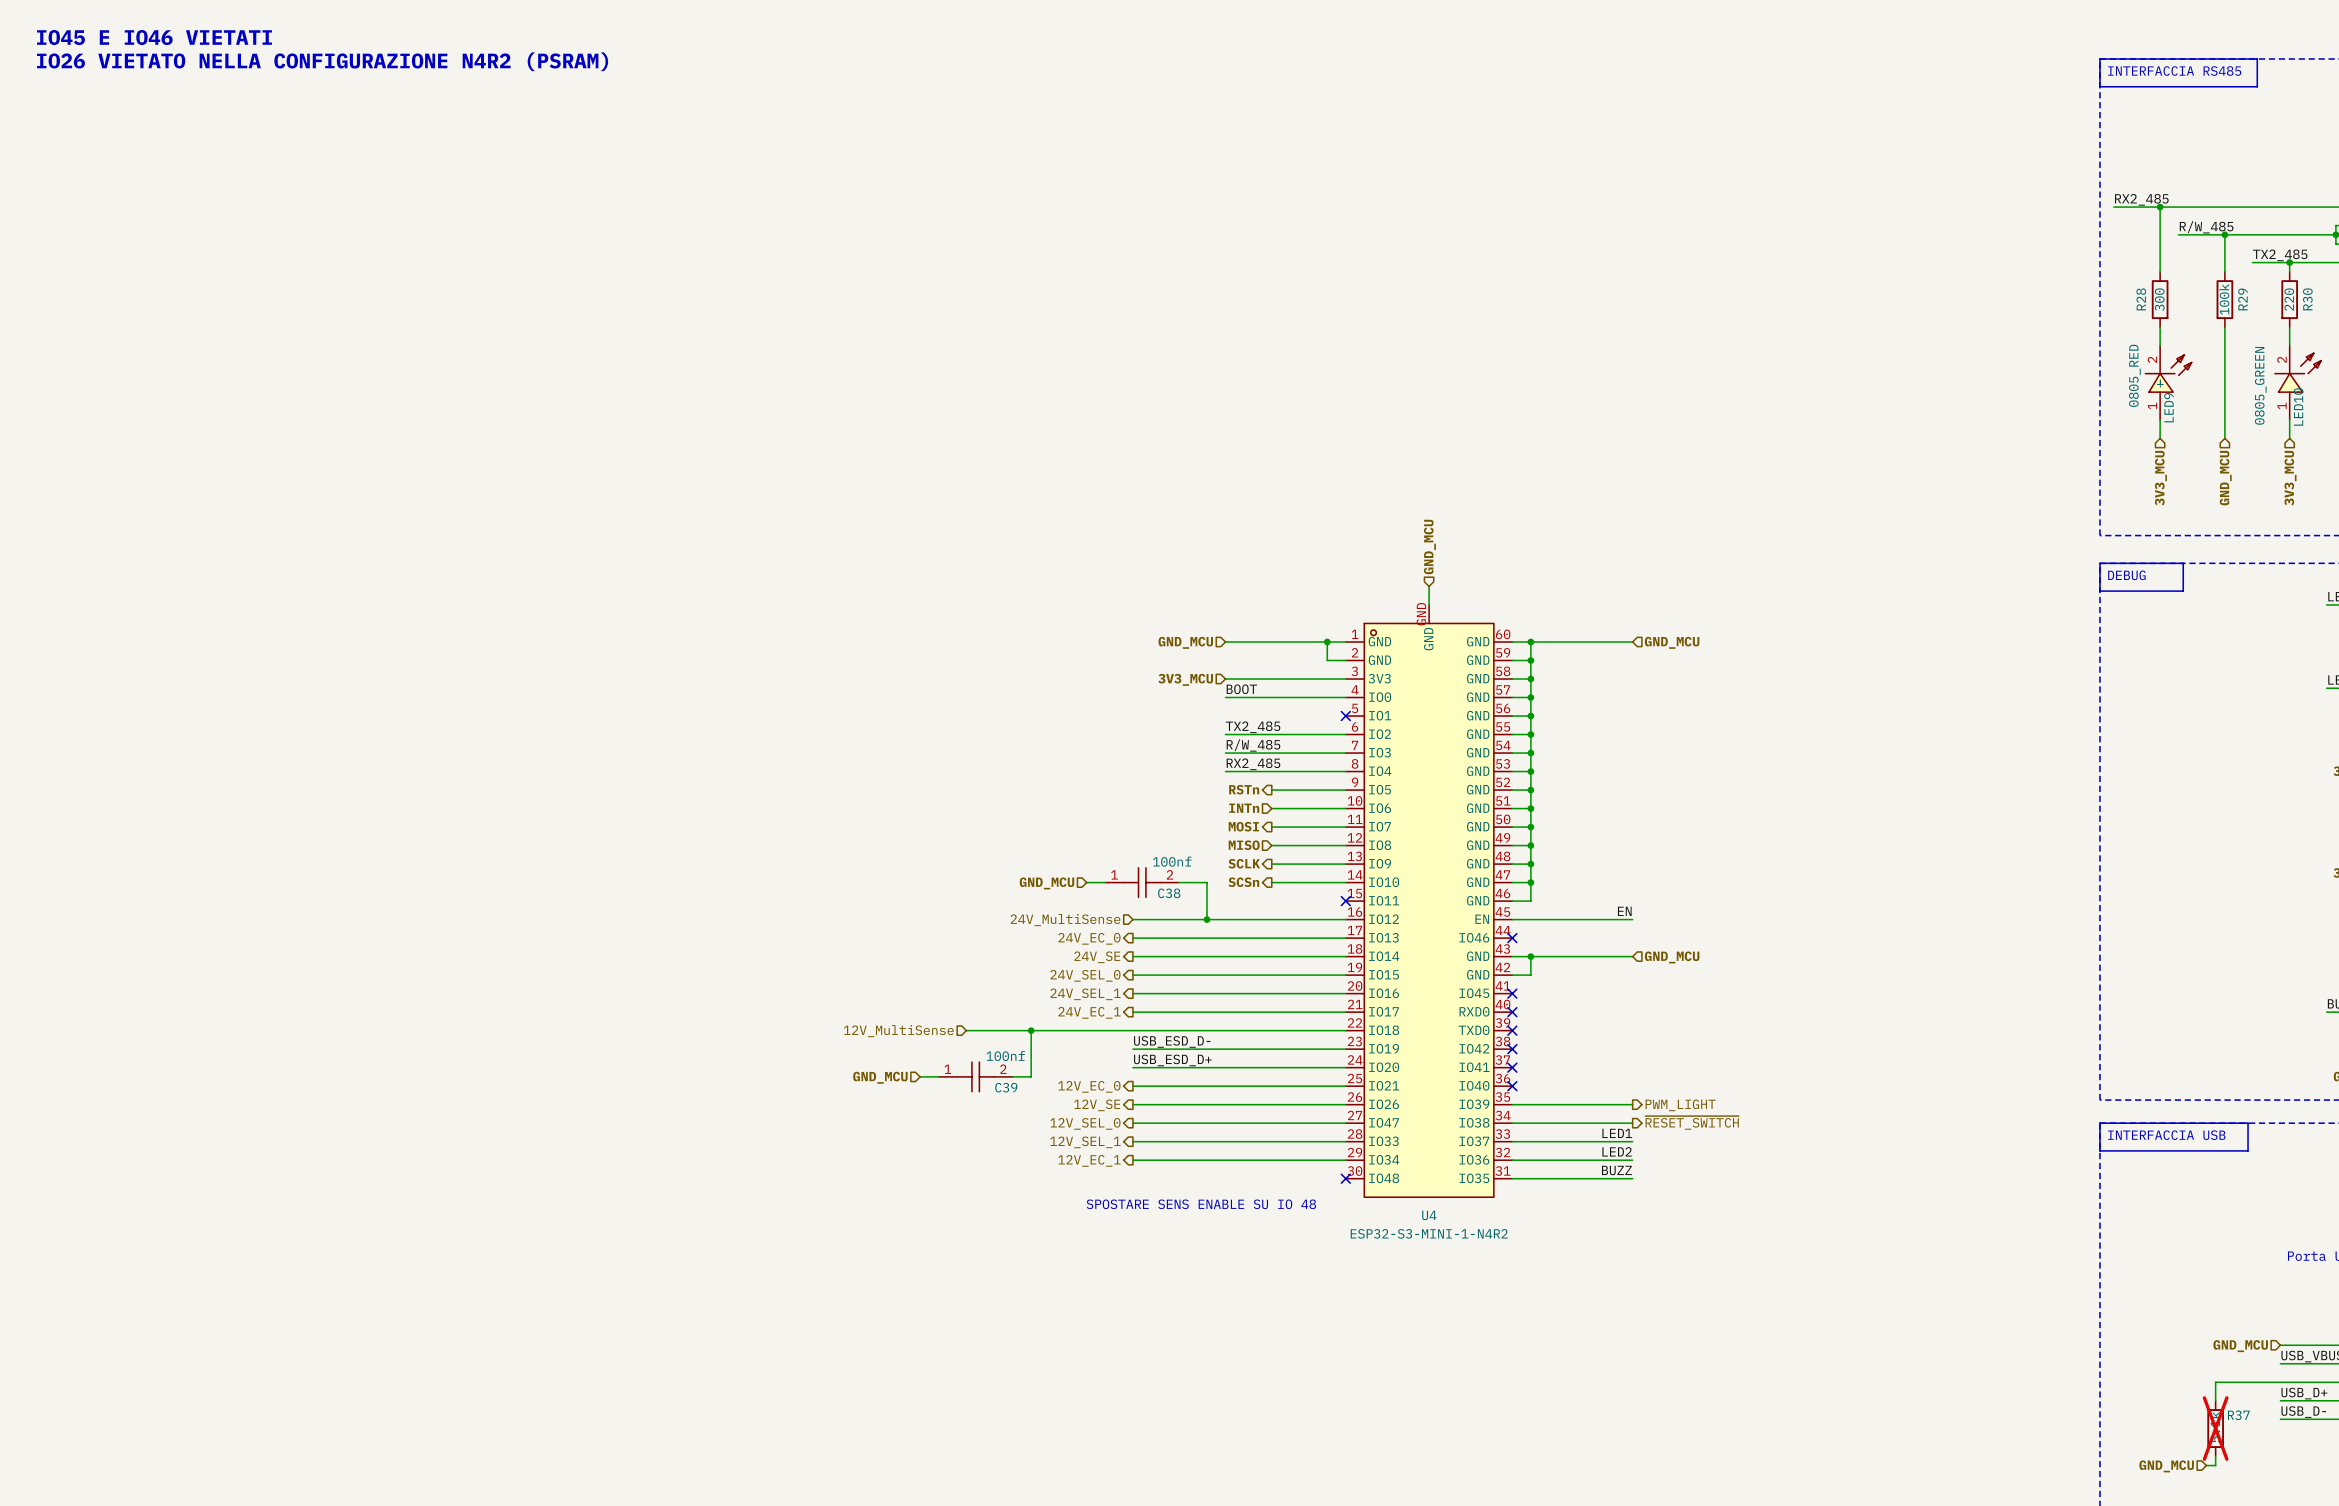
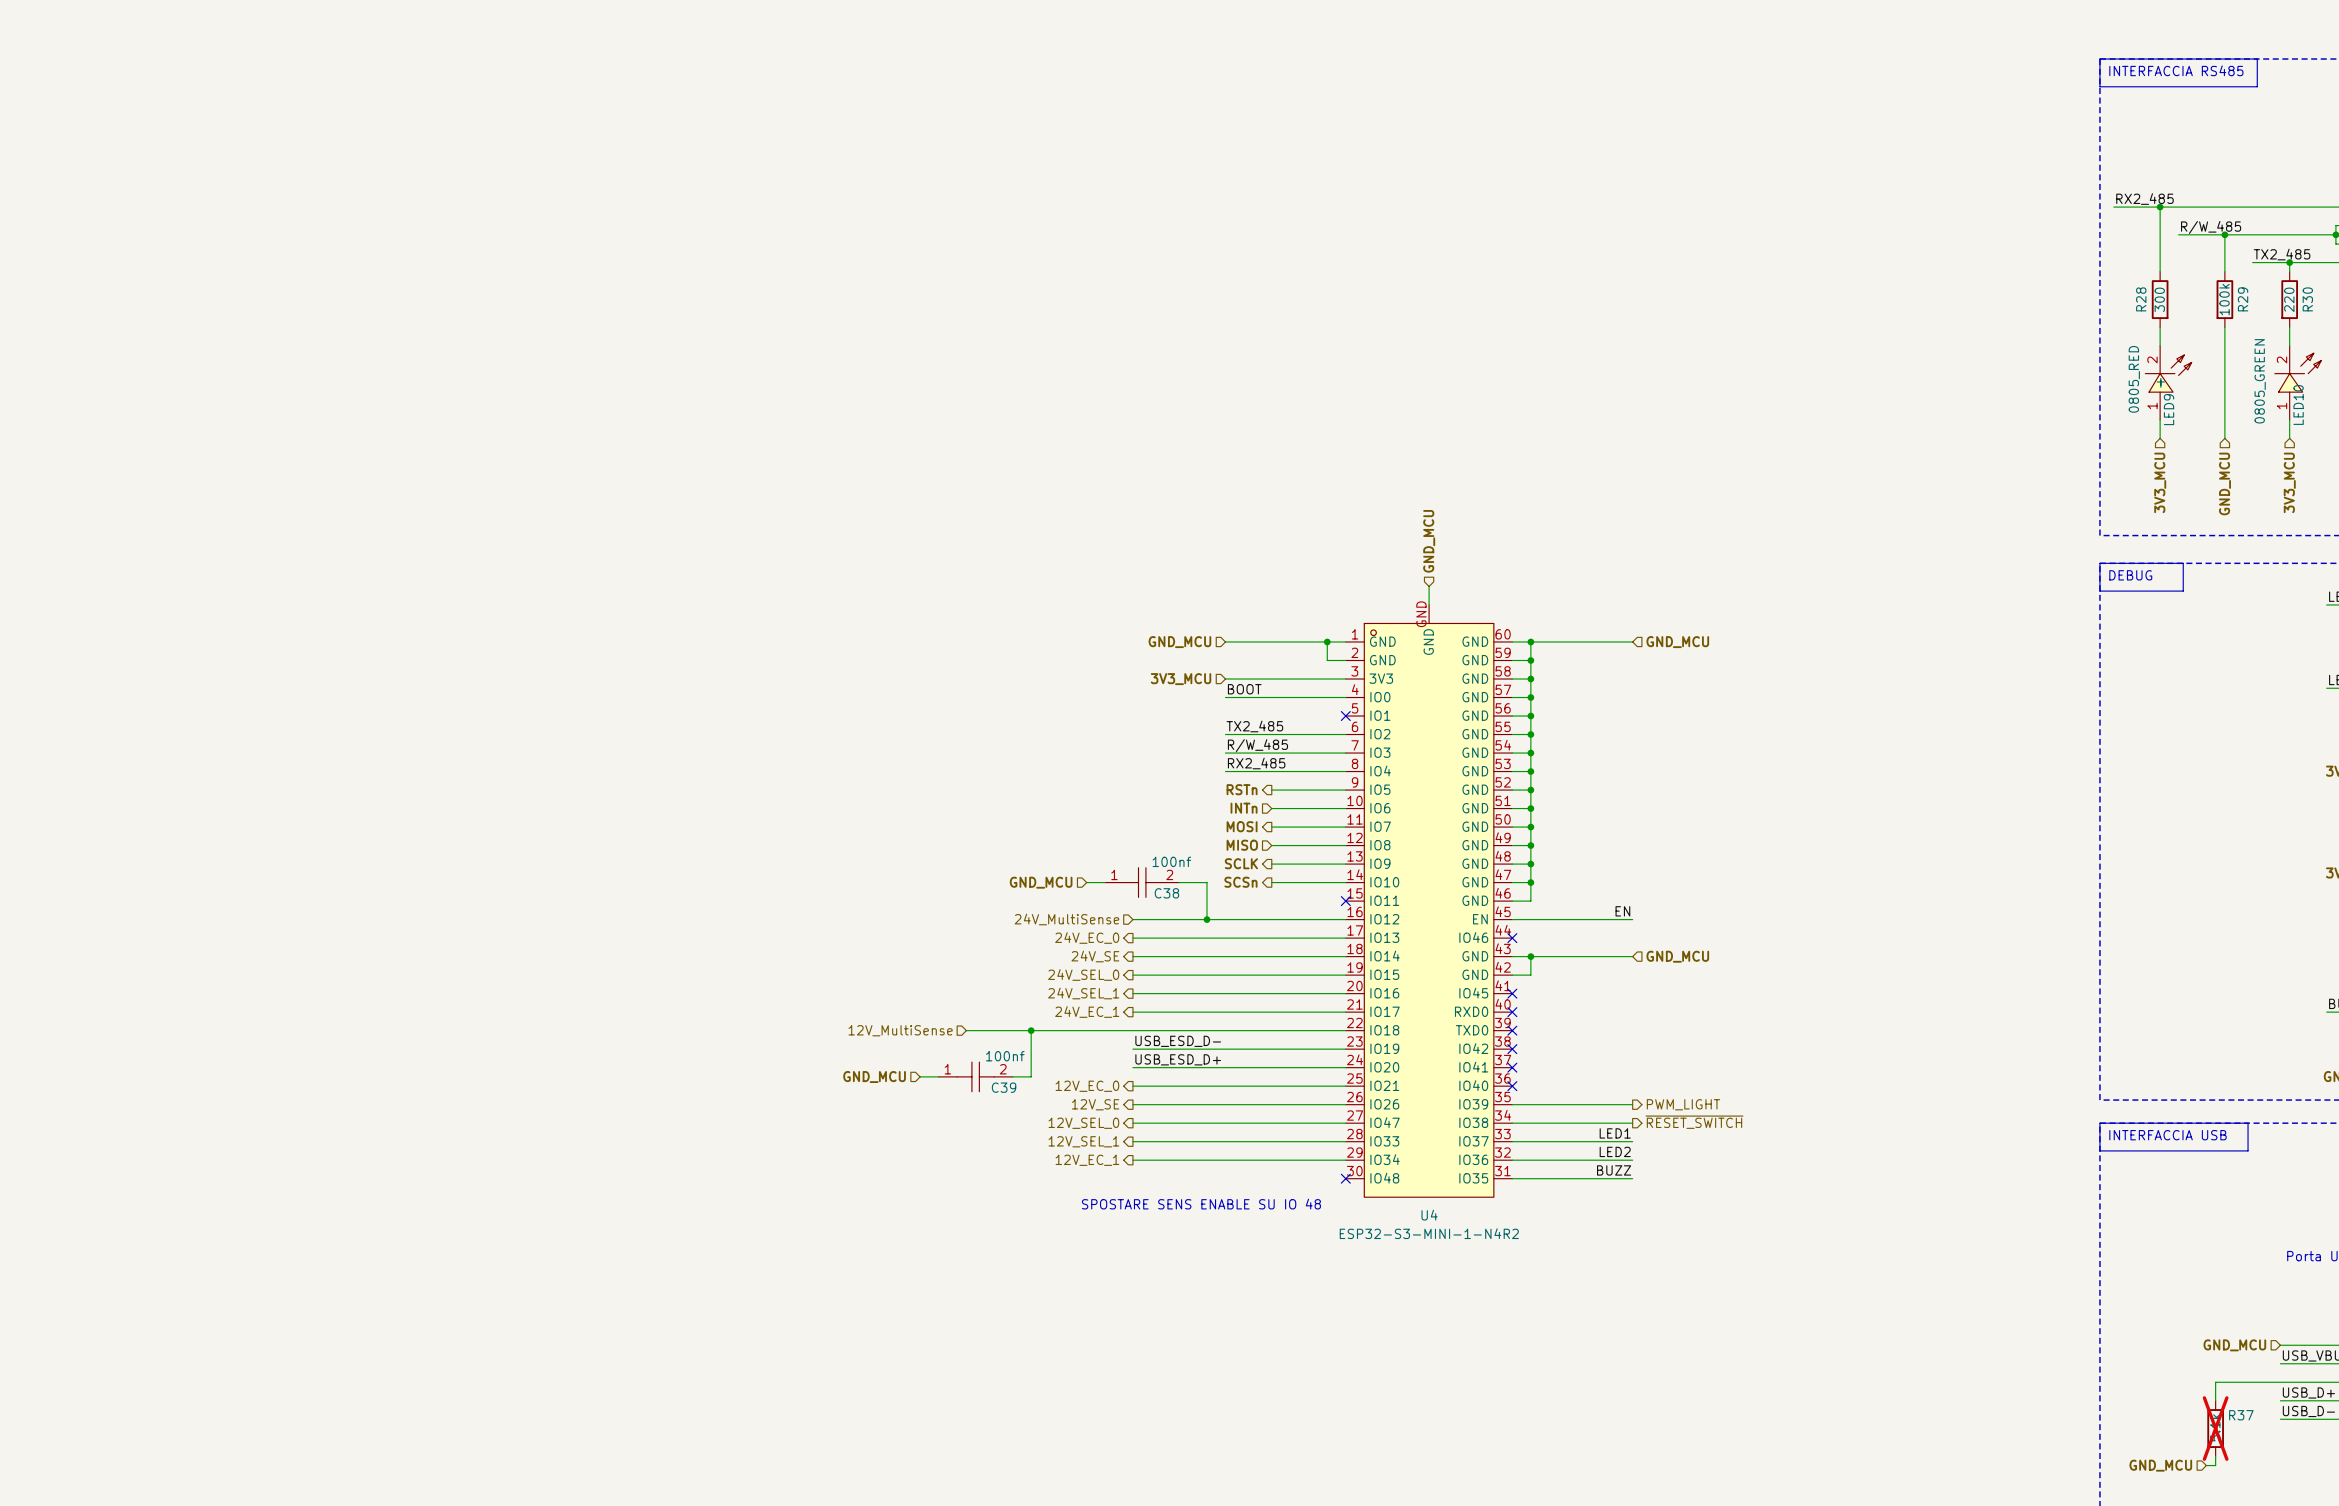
text: IO45 E IO46 VIETATI (154, 37) -> none
text: IO26 VIETATO NELLA CONFIGURAZIONE N4R2 (PSRAM) (322, 61) -> none

